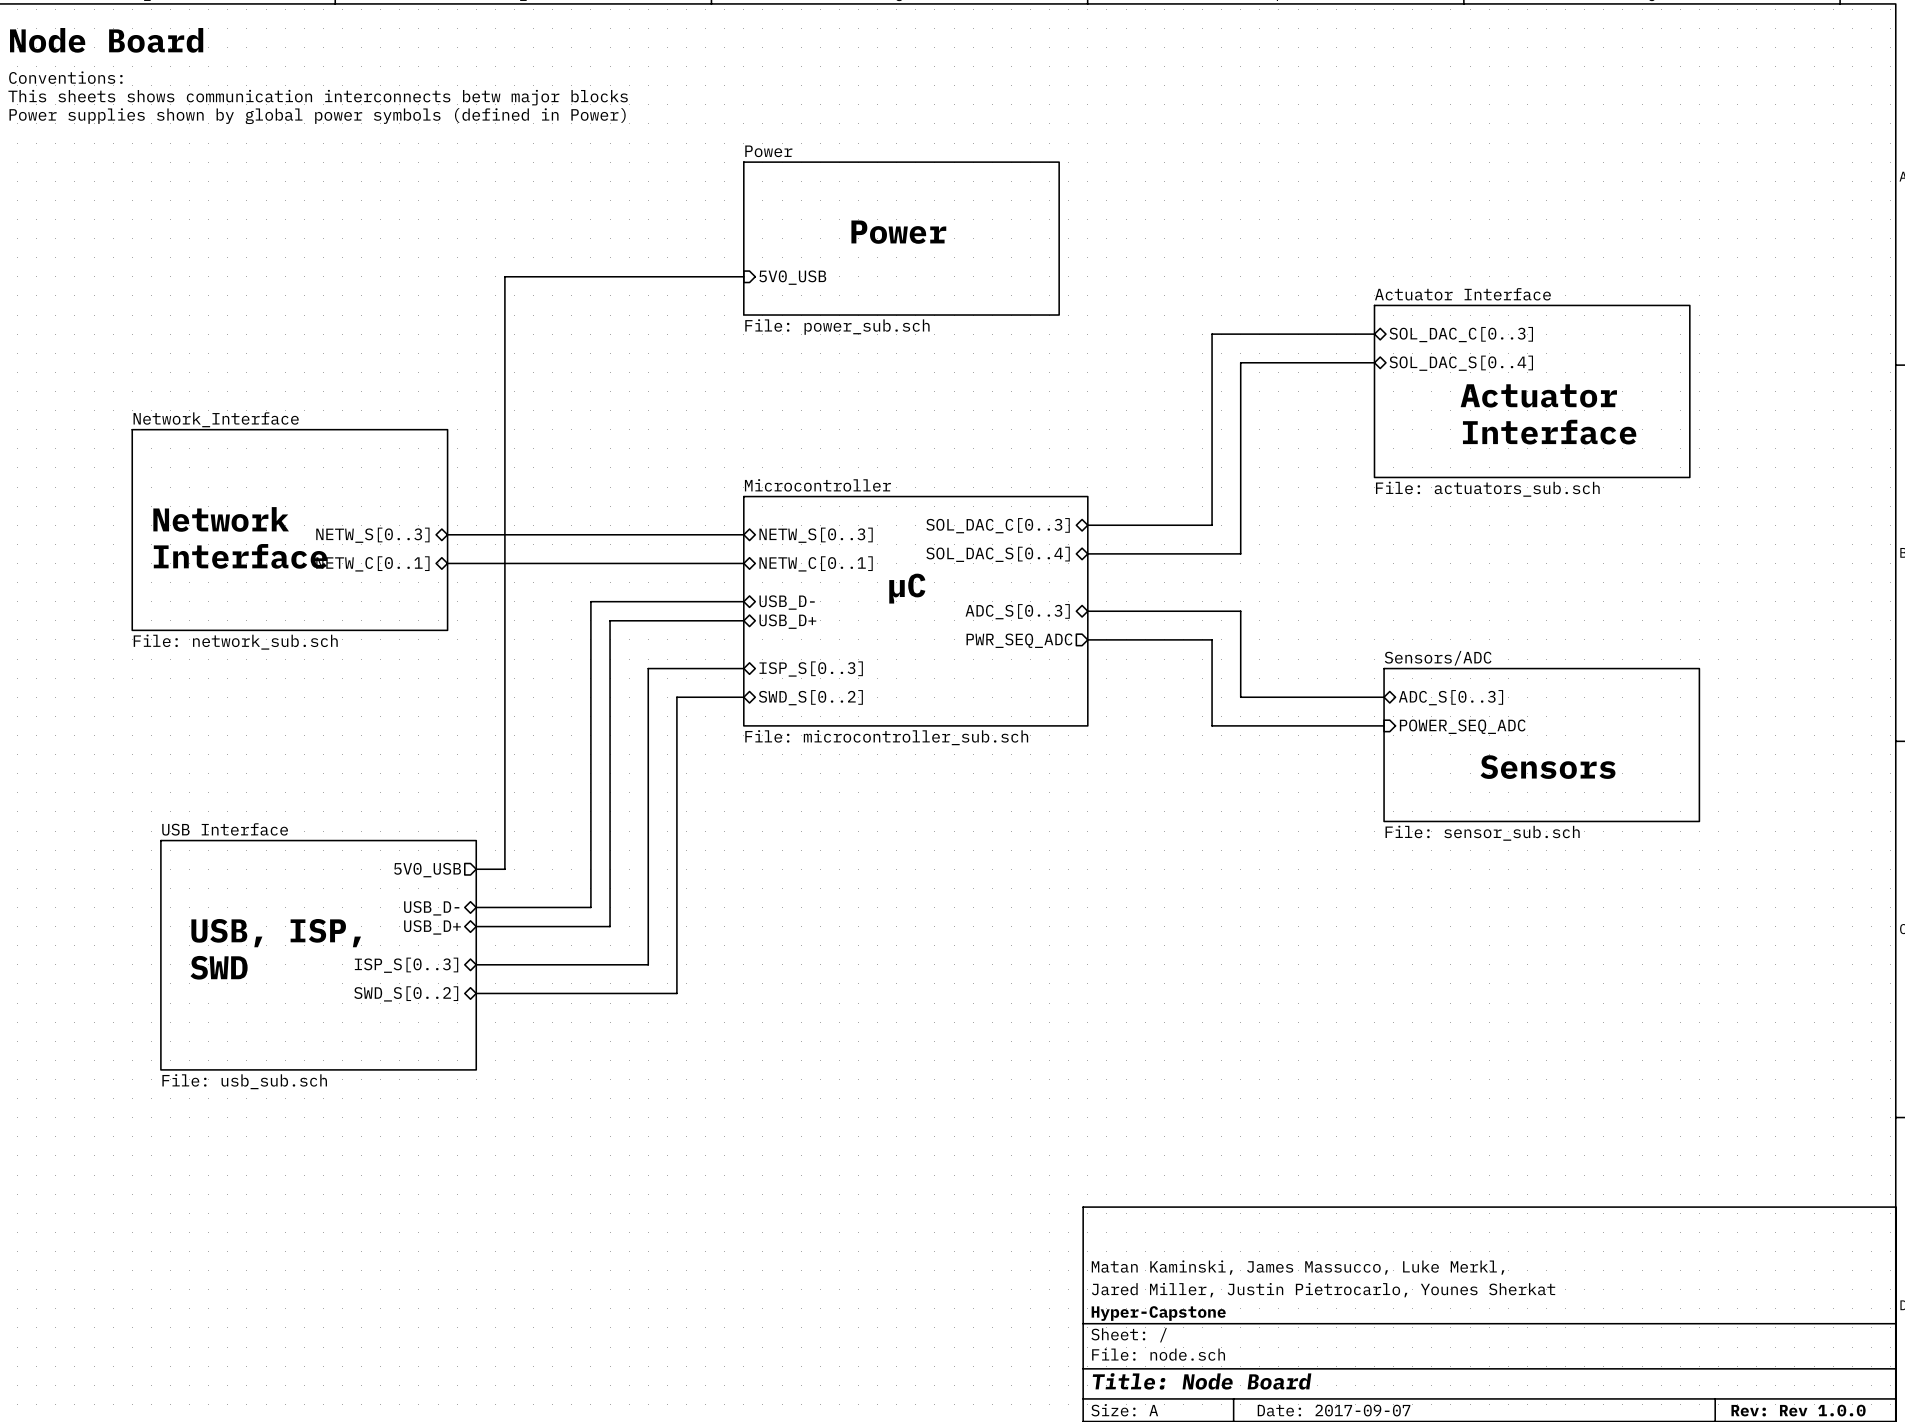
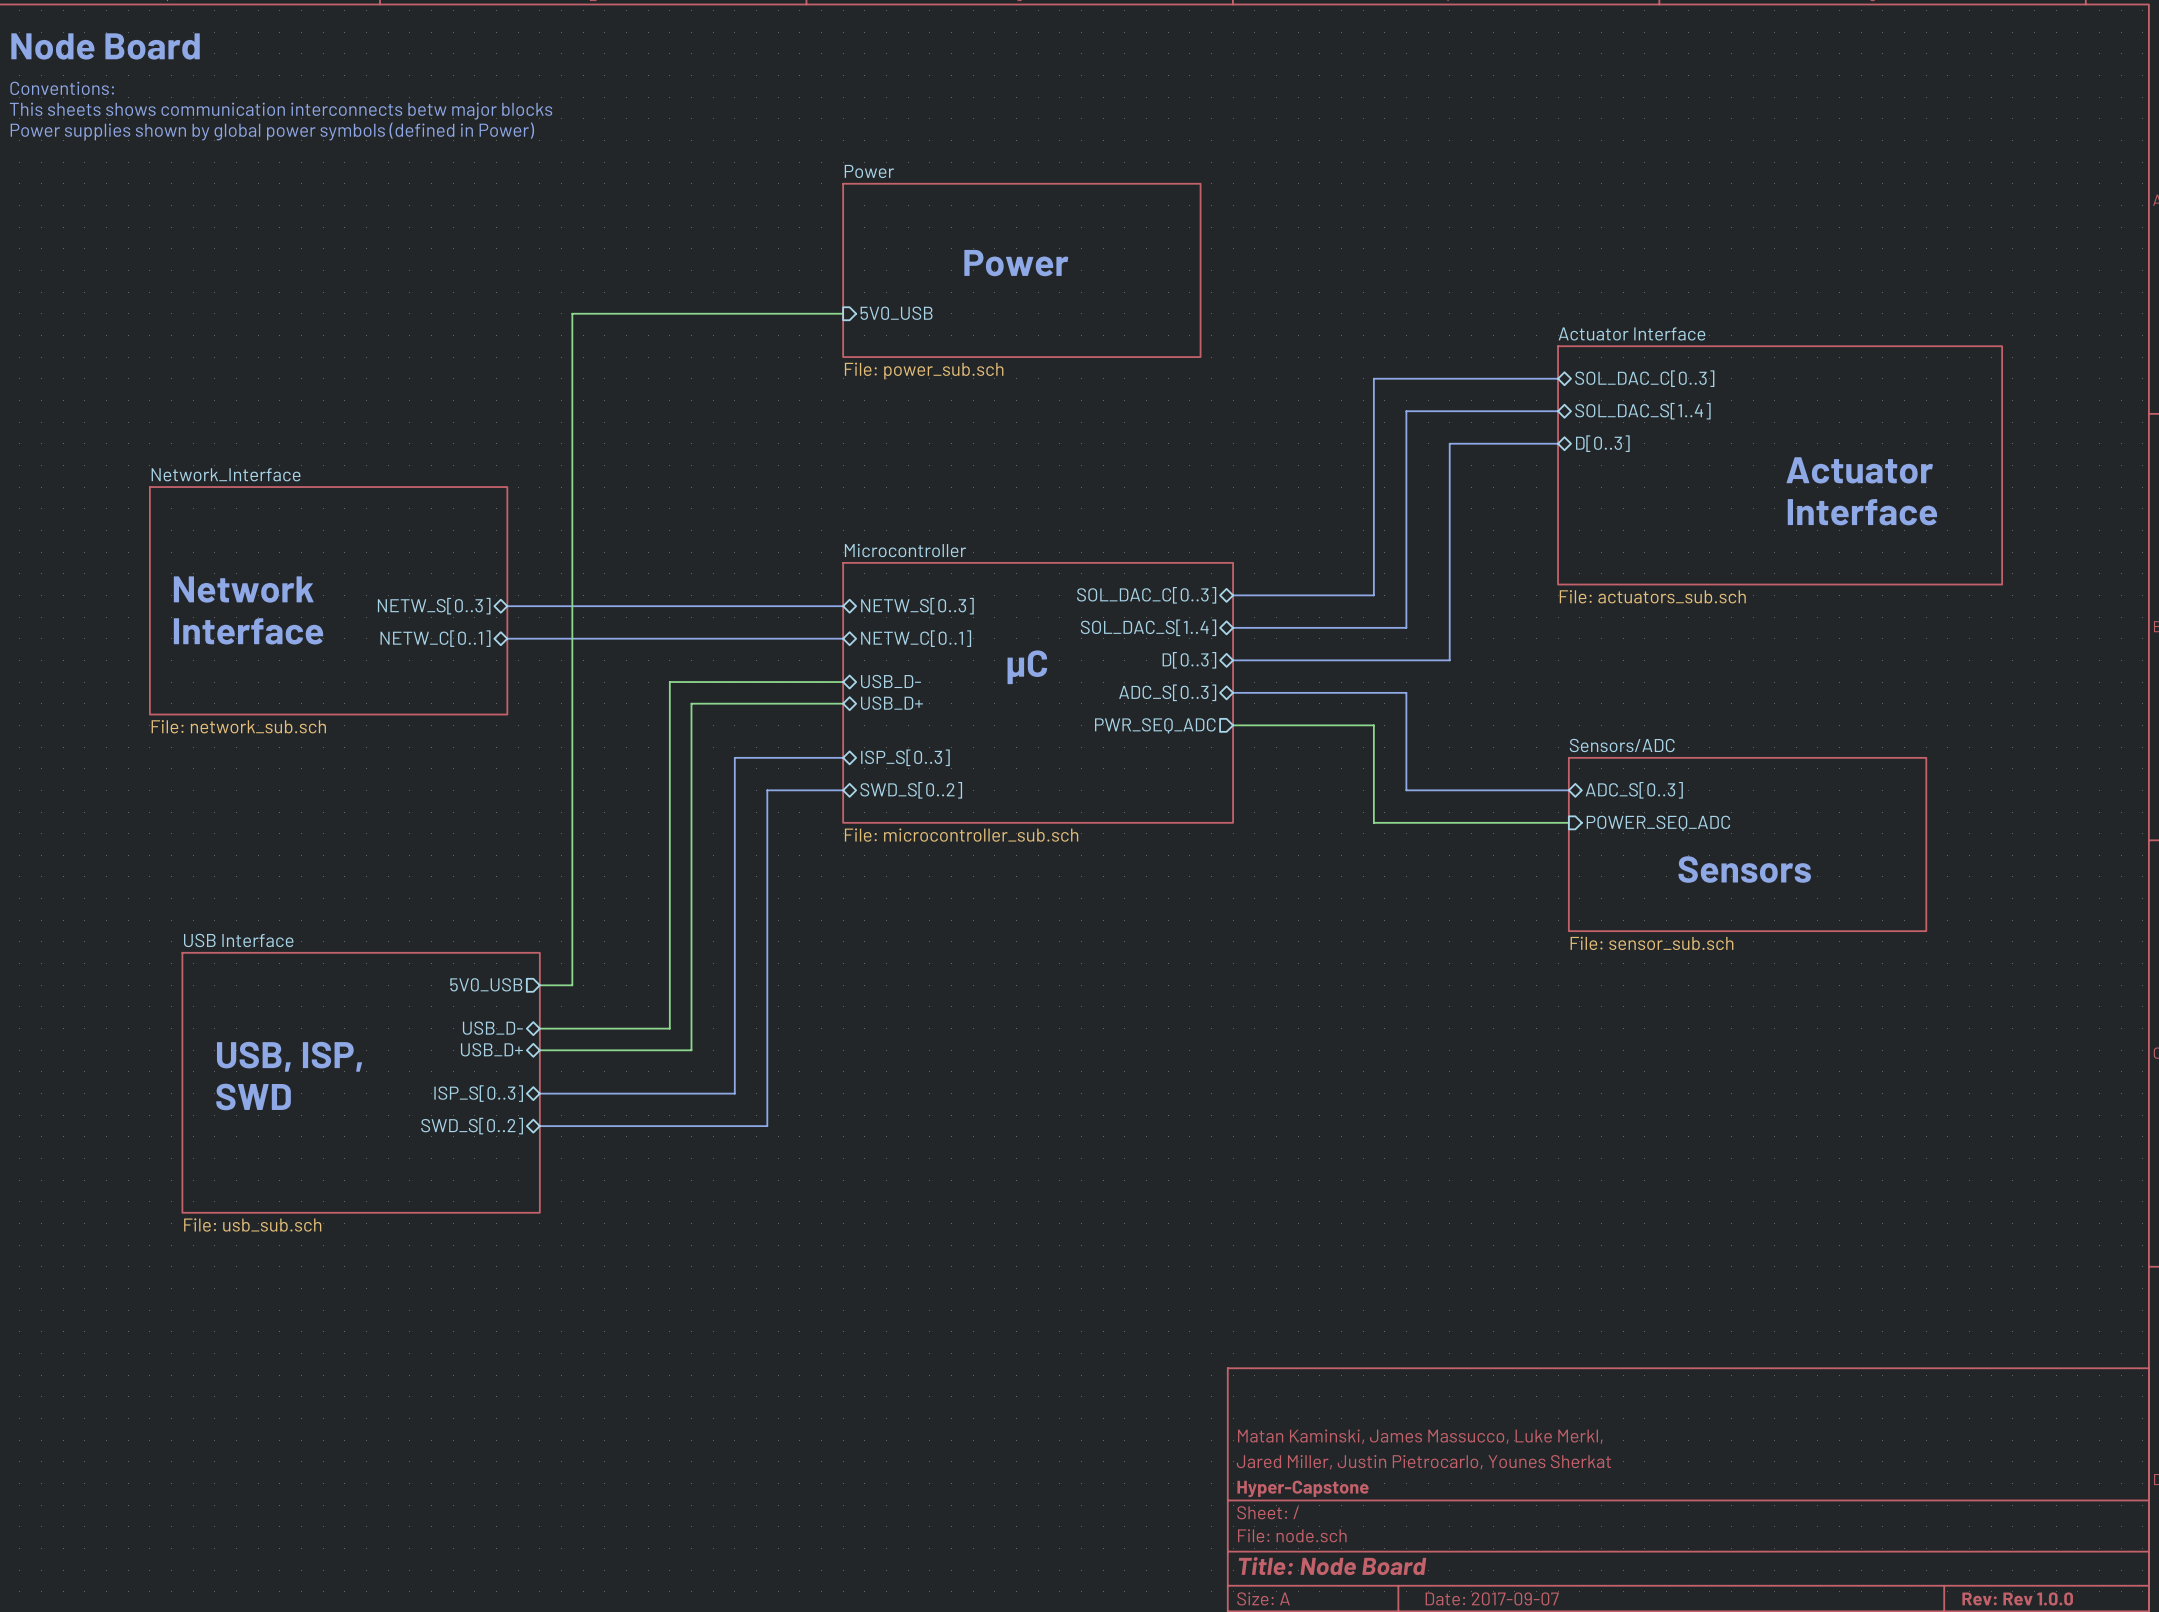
sheet pin: SOL_DAC_S[0..4] (1461, 363) -> SOL_DAC_S[1..4] (1642, 411)
bus: none -> (1558, 443) (1449, 443) (1449, 660) (1233, 660)
sheet pin: none -> D[0..3] (1602, 443)
sheet Actuator Interface: File: actuators_sub.sch (1532, 391) -> none
text position: Actuator (1538, 395) -> Actuator (1859, 470)
sheet Actuator Interface: none -> File: actuators_sub.sch (1780, 465)
text position: Interface (1549, 432) -> Interface (1862, 512)
sheet pin: SOL_DAC_S[0..4] (998, 554) -> SOL_DAC_S[1..4] (1148, 627)
sheet pin: none -> D[0..3] (1189, 660)

